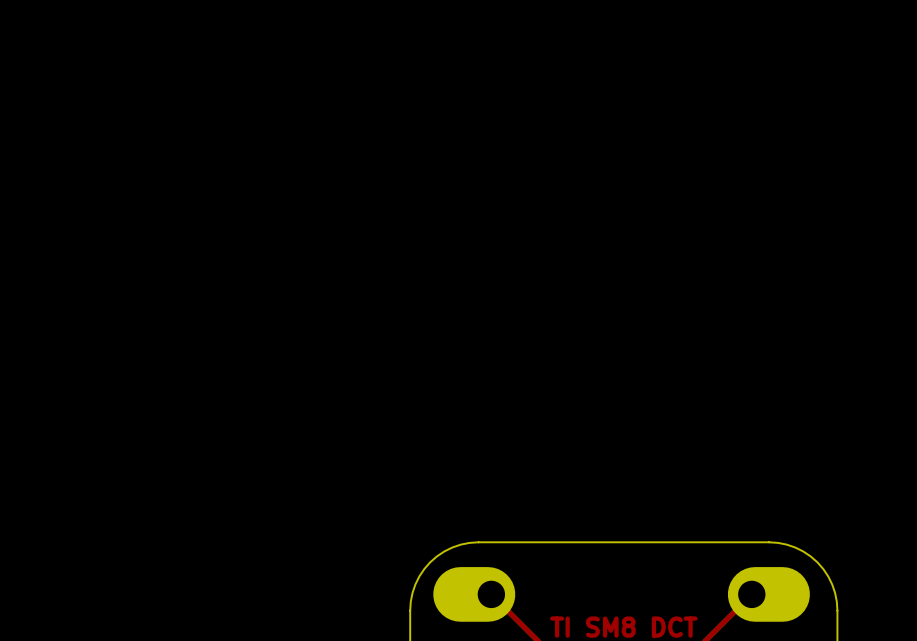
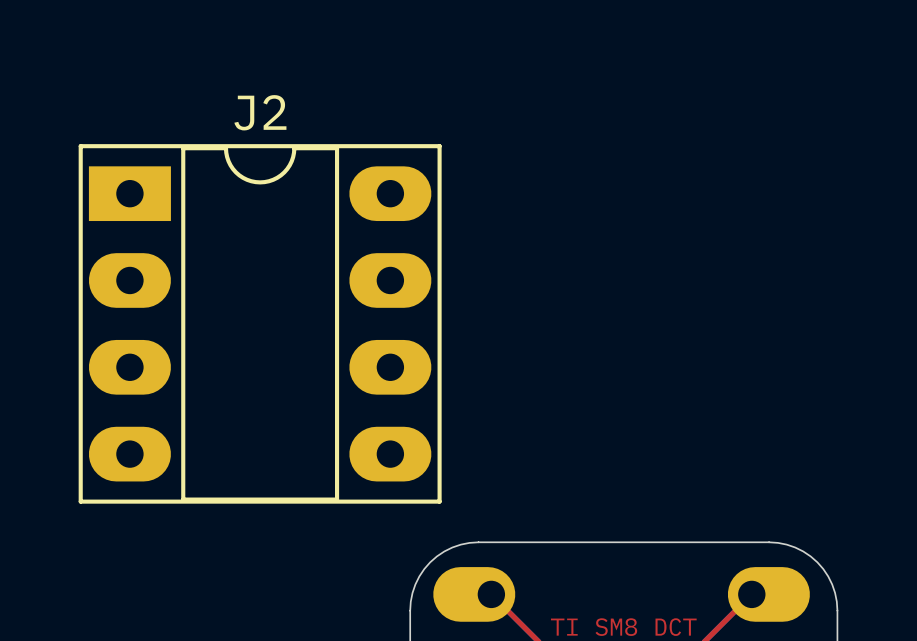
J2: none -> (260, 323)

